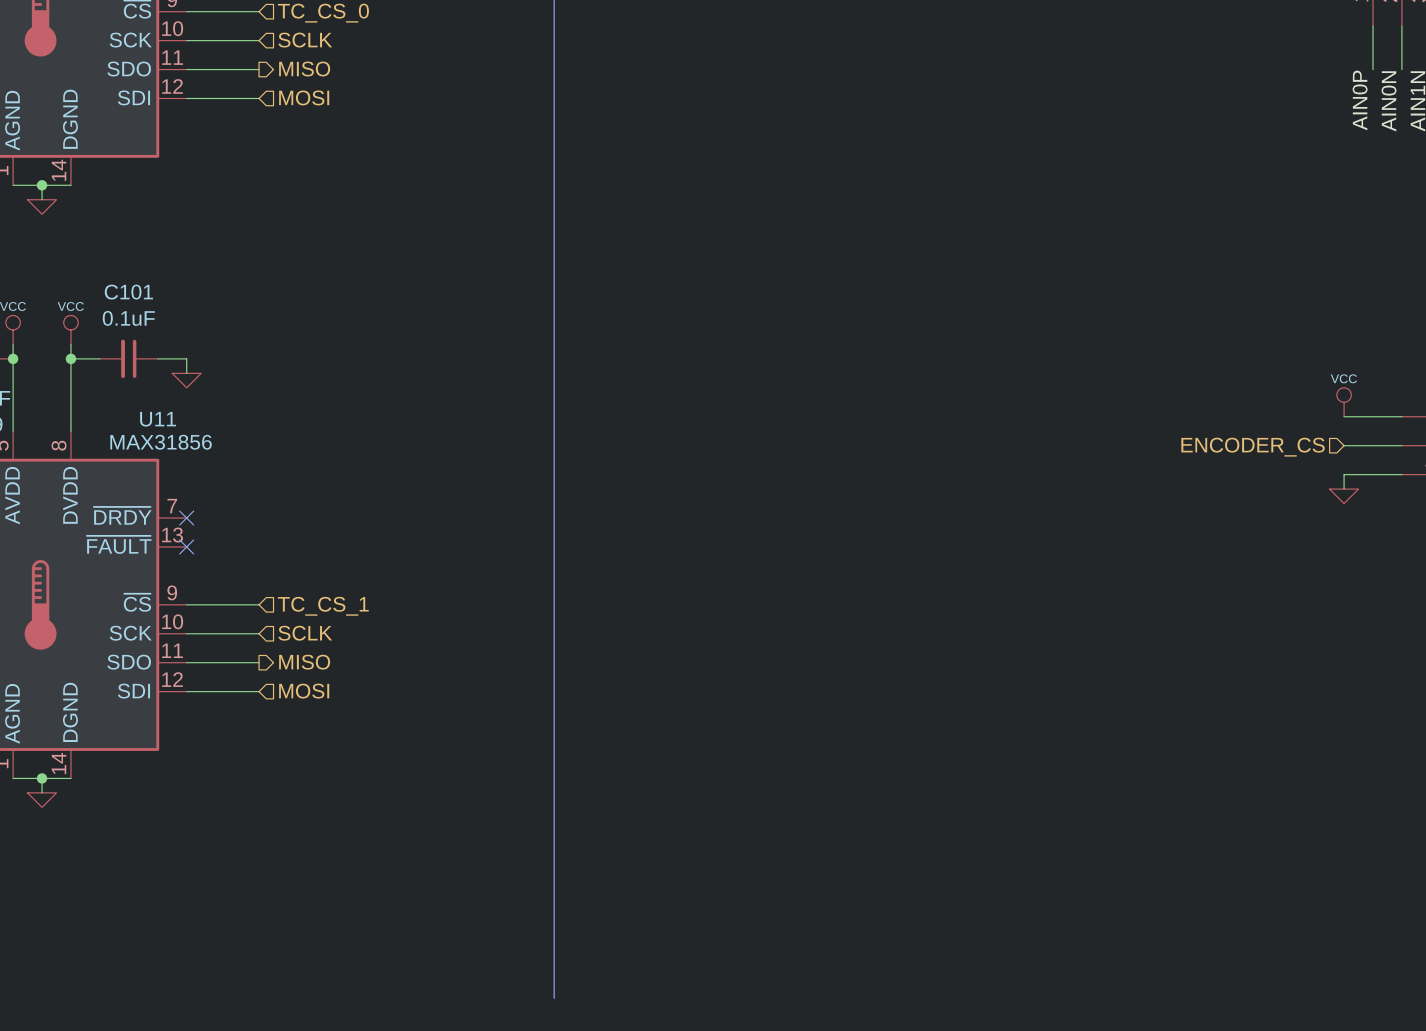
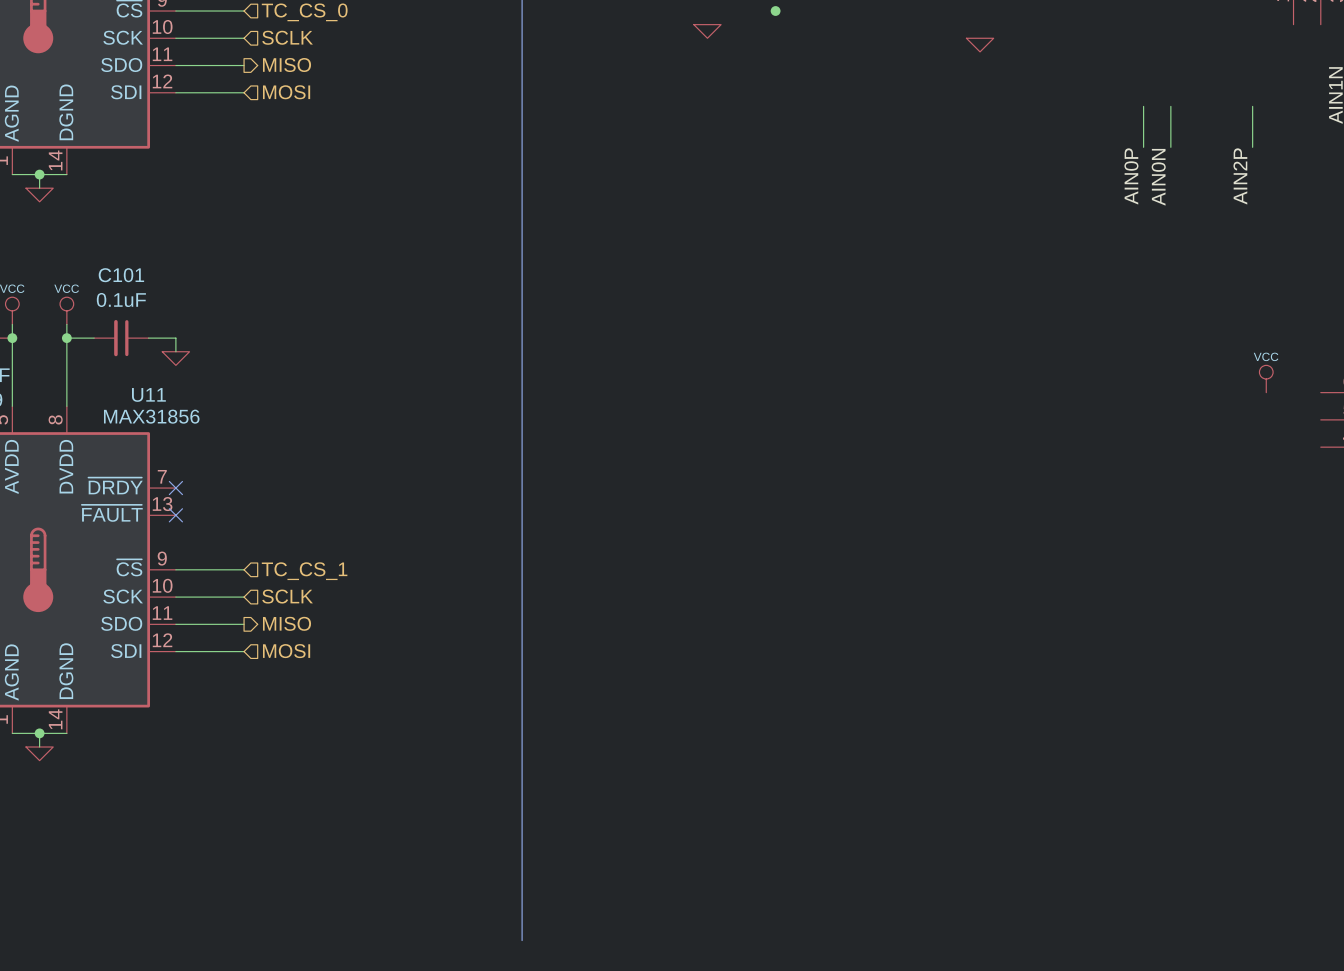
junction: none -> (775, 11)
wire: (1373, 26) (1373, 69) -> (1143, 106) (1143, 147)
wire: (1401, 26) (1401, 69) -> (1170, 106) (1170, 147)
power symbol: none -> (707, 31)
power symbol: none -> (980, 45)
label position: AIN0P (1360, 100) -> AIN0P (1131, 176)
label position: AIN0N (1389, 101) -> AIN0N (1158, 177)
wire: none -> (1252, 106) (1252, 147)
label: none -> AIN2P (1240, 176)
wire: (1344, 416) (1401, 416) -> none
wire: (1344, 445) (1401, 445) -> none
hierarchical label: ENCODER_CS (1253, 447) -> none
wire: (1401, 474) (1344, 474) (1344, 489) -> none
power symbol: (1344, 496) -> none

